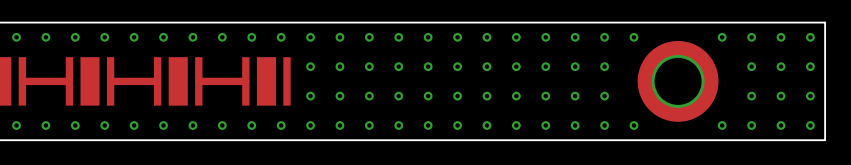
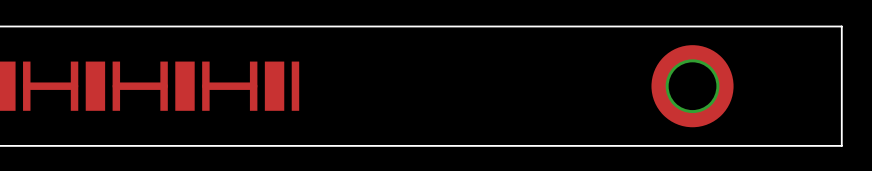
via: (16, 37) -> none
via: (45, 37) -> none
via: (75, 37) -> none
via: (104, 37) -> none
via: (134, 37) -> none
via: (163, 37) -> none
via: (192, 37) -> none
via: (222, 37) -> none
via: (251, 37) -> none
via: (281, 37) -> none
via: (310, 37) -> none
via: (339, 37) -> none
via: (369, 37) -> none
via: (398, 37) -> none
via: (428, 37) -> none
via: (457, 37) -> none
via: (486, 37) -> none
via: (516, 37) -> none
via: (545, 37) -> none
via: (575, 37) -> none
via: (604, 37) -> none
via: (633, 37) -> none
via: (722, 37) -> none
via: (751, 37) -> none
via: (781, 37) -> none
via: (810, 37) -> none
via: (310, 66) -> none
via: (339, 66) -> none
via: (369, 66) -> none
via: (398, 66) -> none
via: (428, 66) -> none
via: (457, 66) -> none
via: (486, 66) -> none
via: (516, 66) -> none
via: (545, 66) -> none
via: (575, 66) -> none
via: (604, 66) -> none
via: (751, 66) -> none
via: (781, 66) -> none
via: (810, 66) -> none
via: (310, 96) -> none
via: (339, 96) -> none
via: (369, 96) -> none
via: (398, 96) -> none
via: (428, 96) -> none
via: (457, 96) -> none
via: (486, 96) -> none
via: (516, 96) -> none
via: (545, 96) -> none
via: (575, 96) -> none
via: (604, 96) -> none
via: (751, 96) -> none
via: (781, 96) -> none
via: (810, 96) -> none
via: (16, 125) -> none
via: (45, 125) -> none
via: (75, 125) -> none
via: (104, 125) -> none
via: (134, 125) -> none
via: (163, 125) -> none
via: (192, 125) -> none
via: (222, 125) -> none
via: (251, 125) -> none
via: (281, 125) -> none
via: (310, 125) -> none
via: (339, 125) -> none
via: (369, 125) -> none
via: (398, 125) -> none
via: (428, 125) -> none
via: (457, 125) -> none
via: (486, 125) -> none
via: (516, 125) -> none
via: (545, 125) -> none
via: (575, 125) -> none
via: (604, 125) -> none
via: (633, 125) -> none
via: (722, 125) -> none
via: (751, 125) -> none
via: (781, 125) -> none
via: (810, 125) -> none

